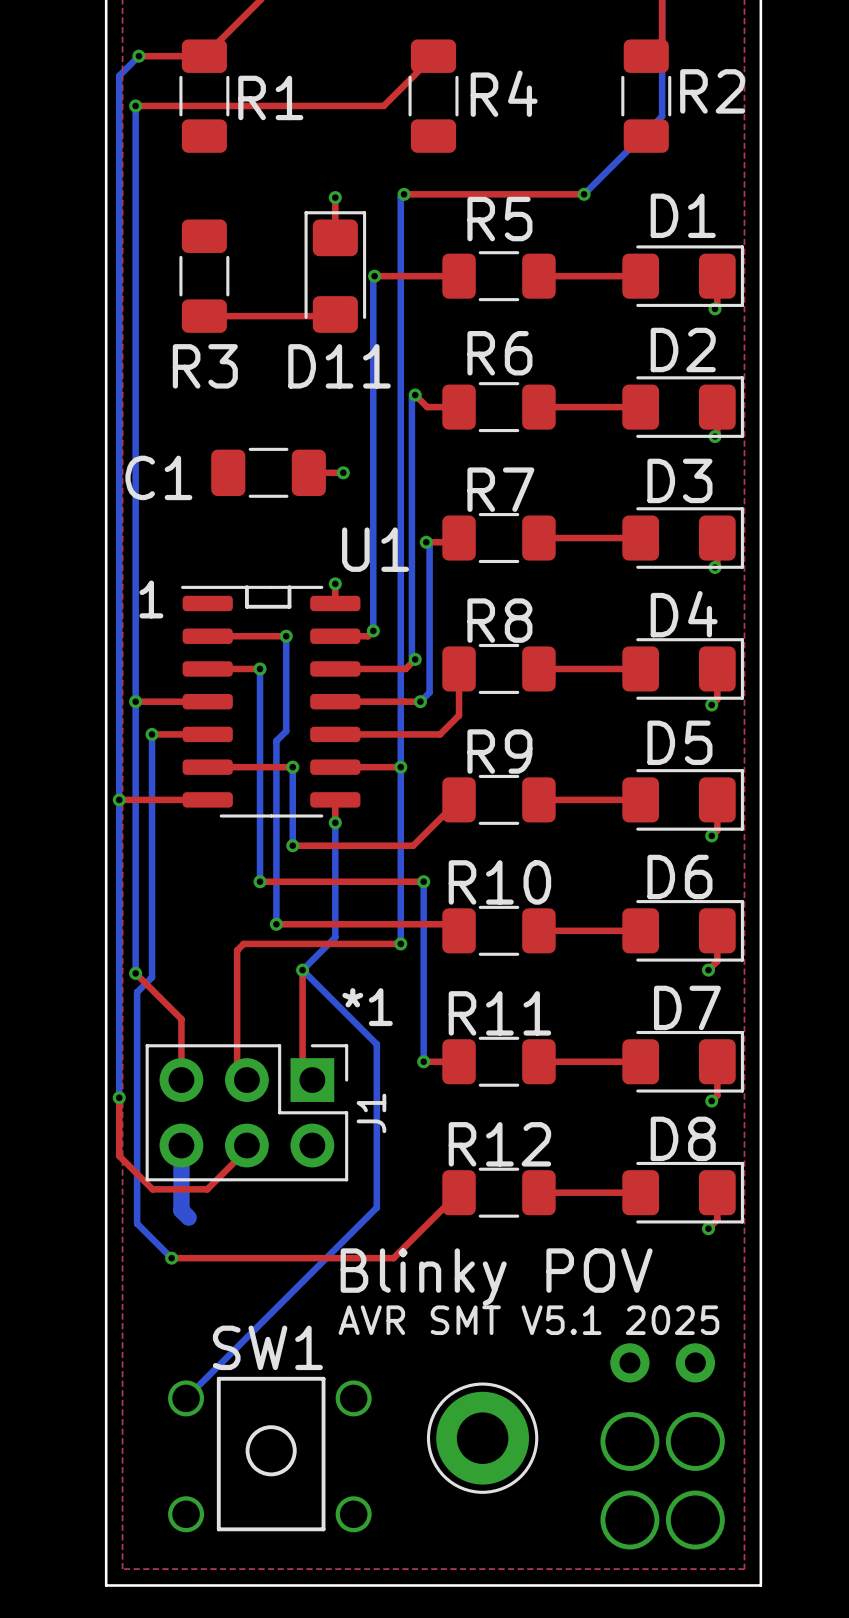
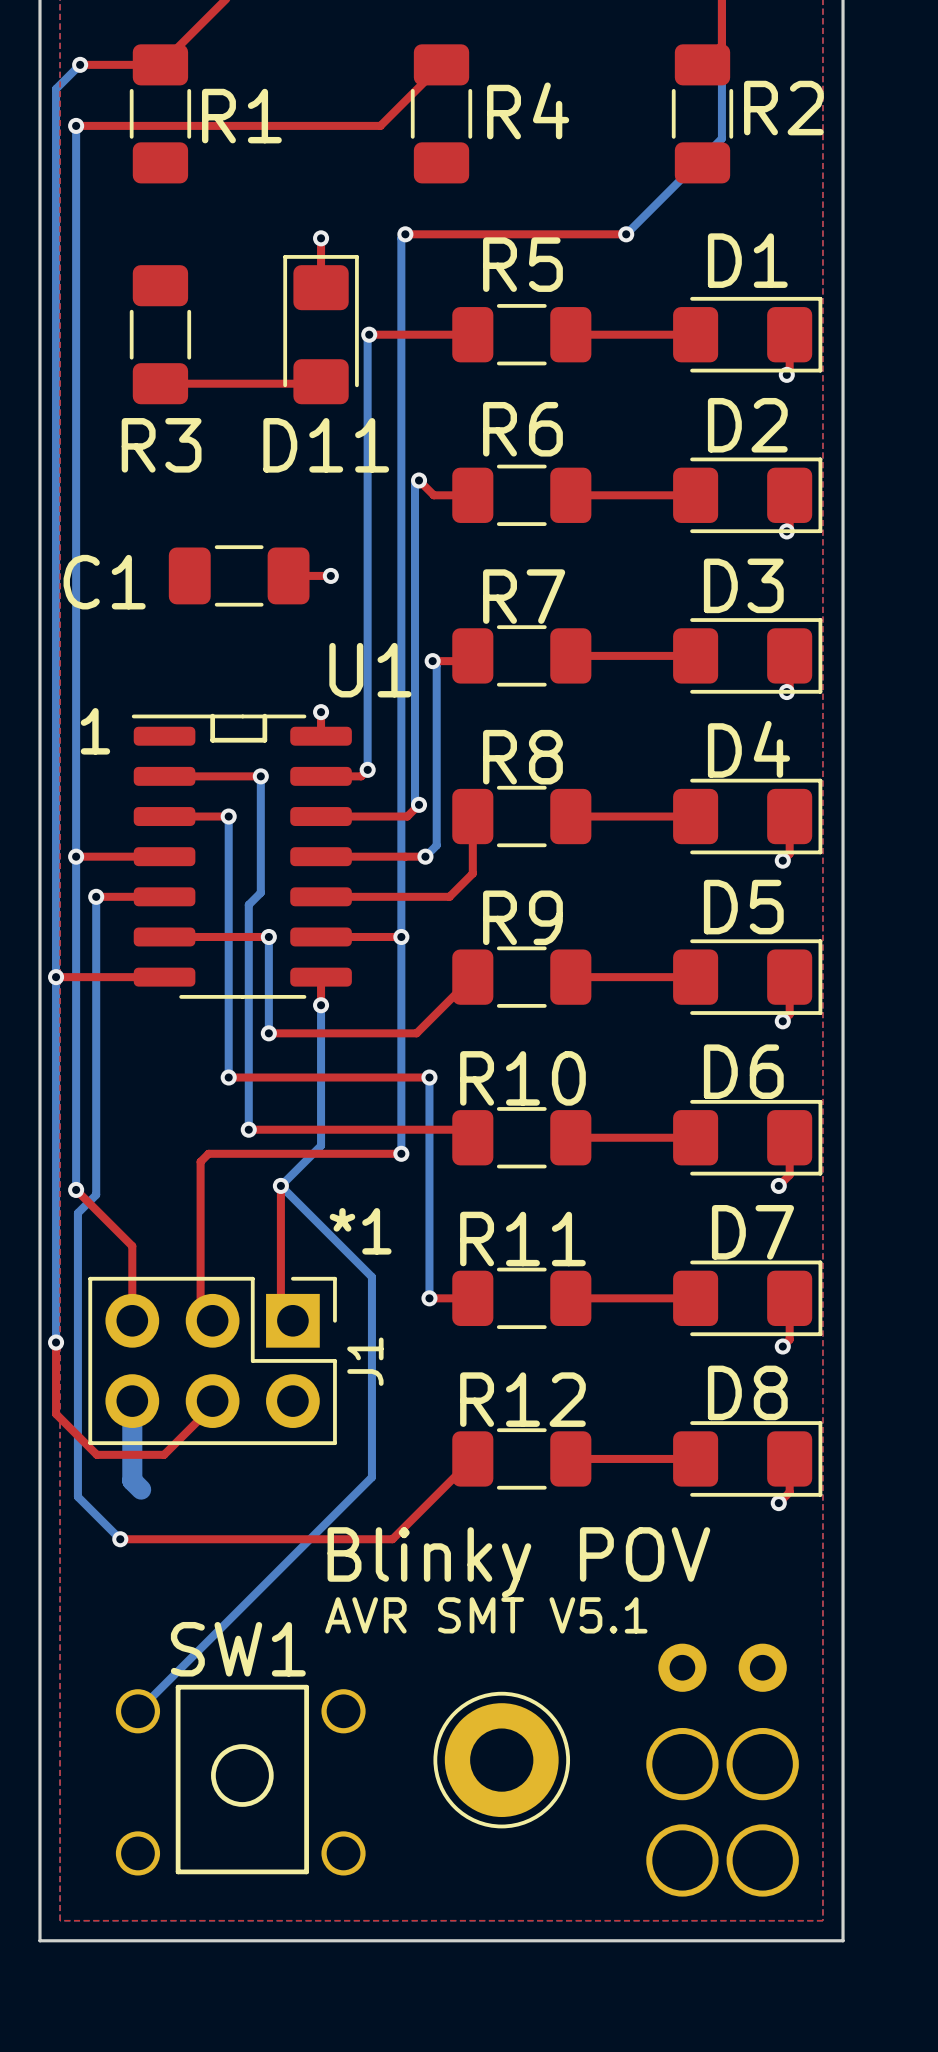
text: AVR SMT V5.1 2025 (528, 1320) -> AVR SMT V5.1 (486, 1615)

